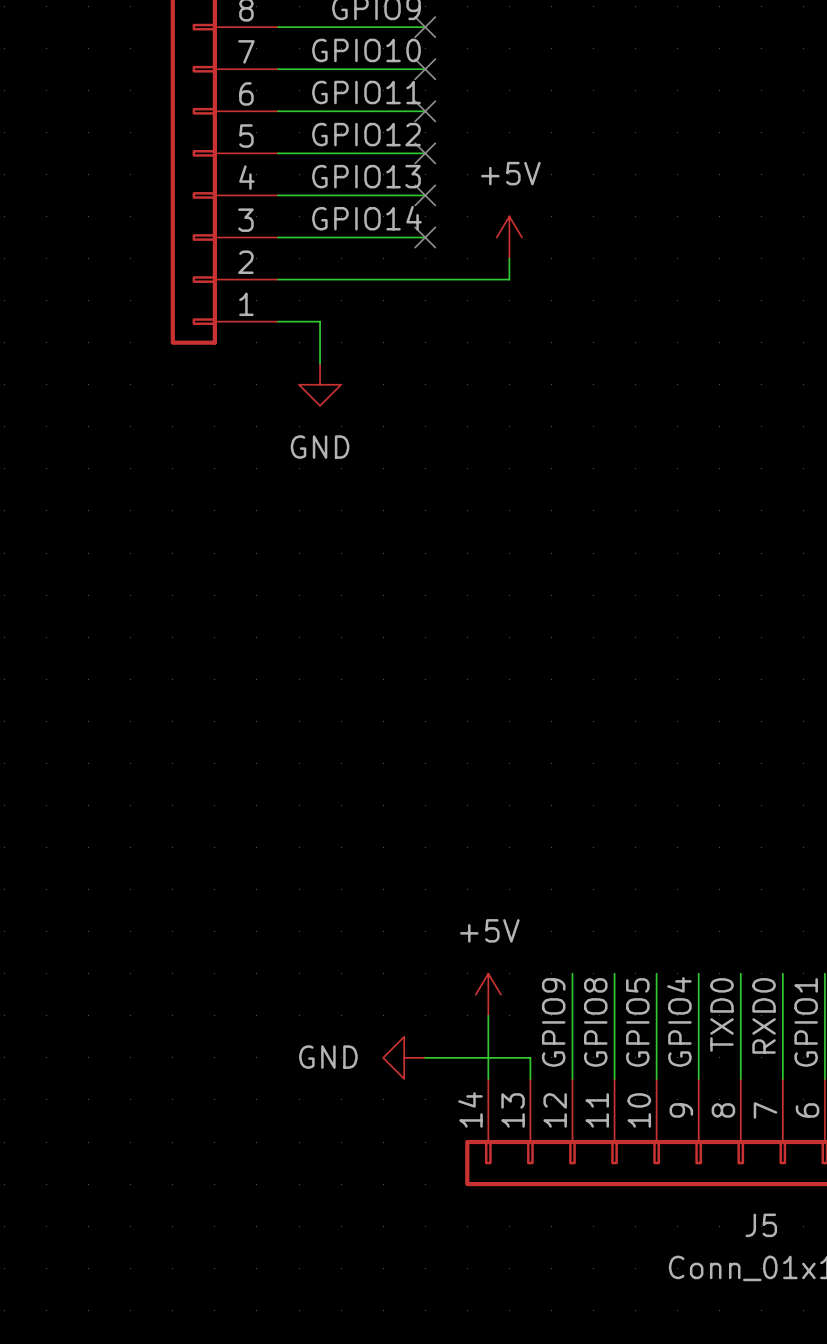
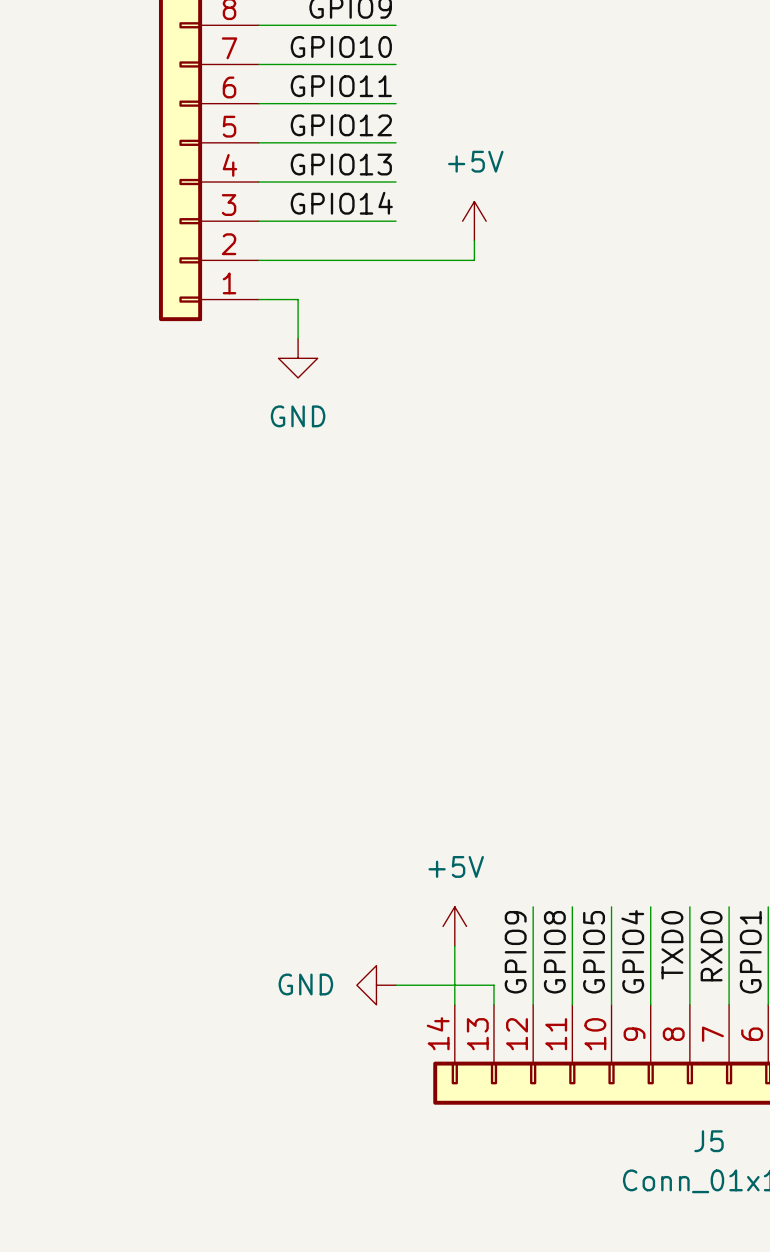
no-connect mark: (425, 27) -> none
no-connect mark: (425, 69) -> none
no-connect mark: (425, 111) -> none
no-connect mark: (425, 153) -> none
no-connect mark: (425, 195) -> none
no-connect mark: (425, 237) -> none

